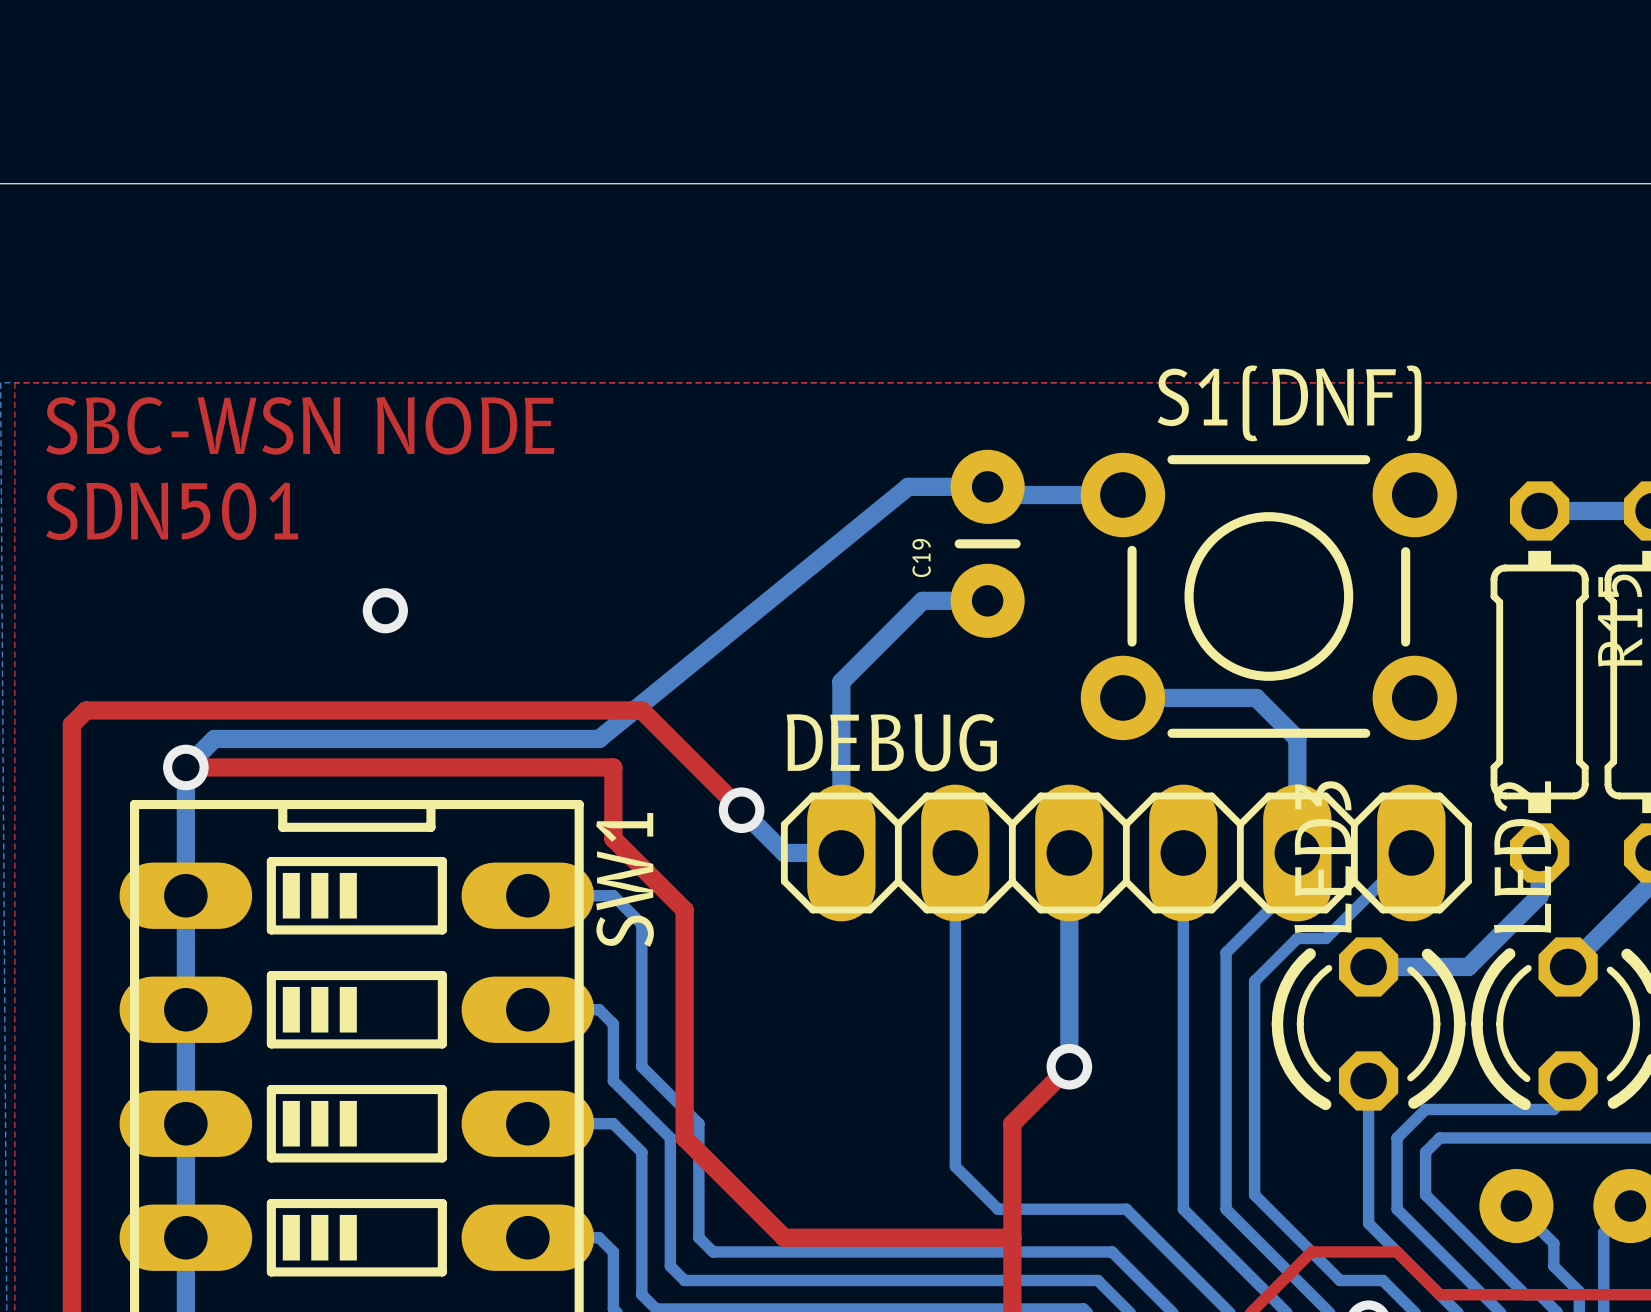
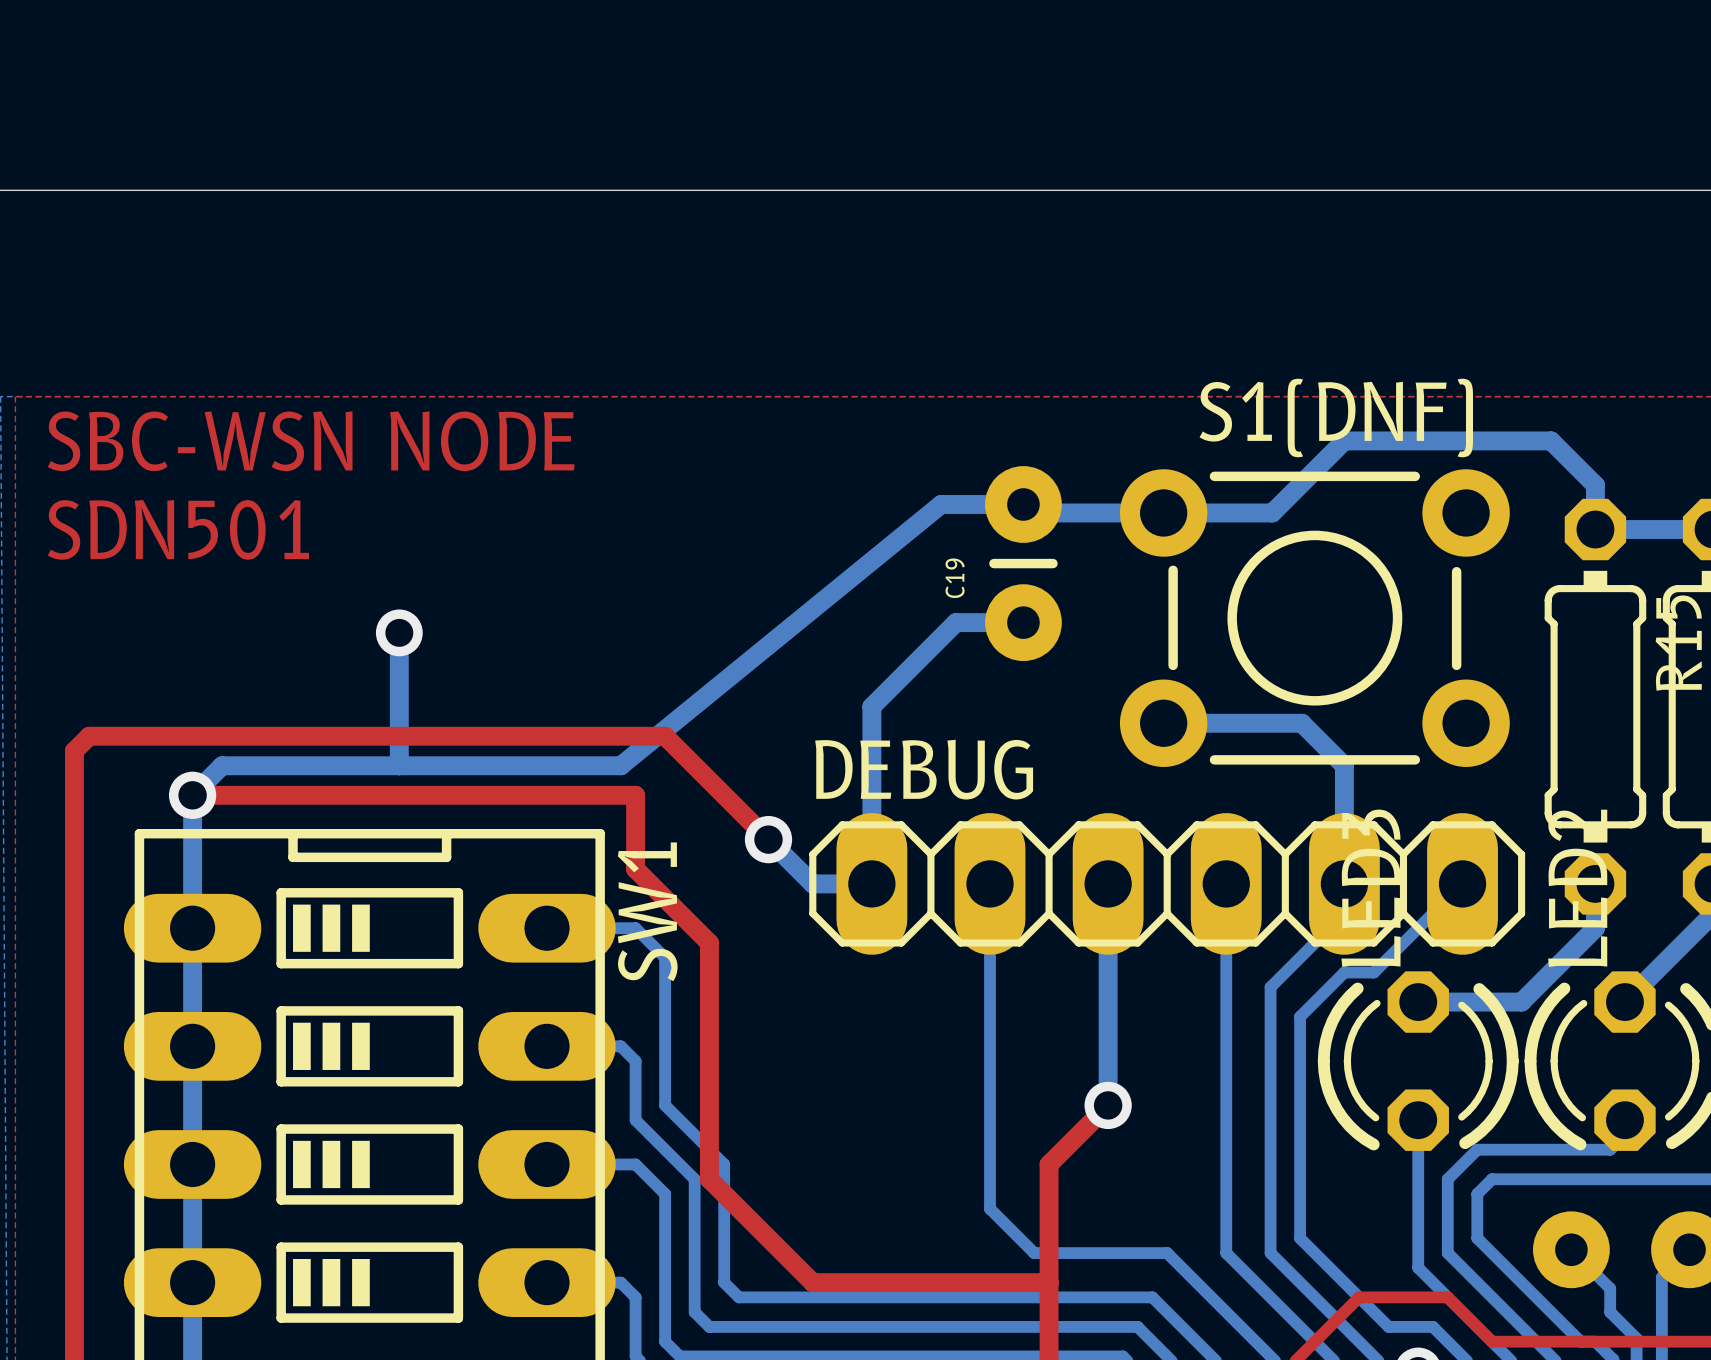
bottom track: none -> (1163, 512) (1272, 512) (1344, 440) (1551, 440) (1595, 485) (1595, 529)
bottom track: none -> (399, 632) (399, 765)

